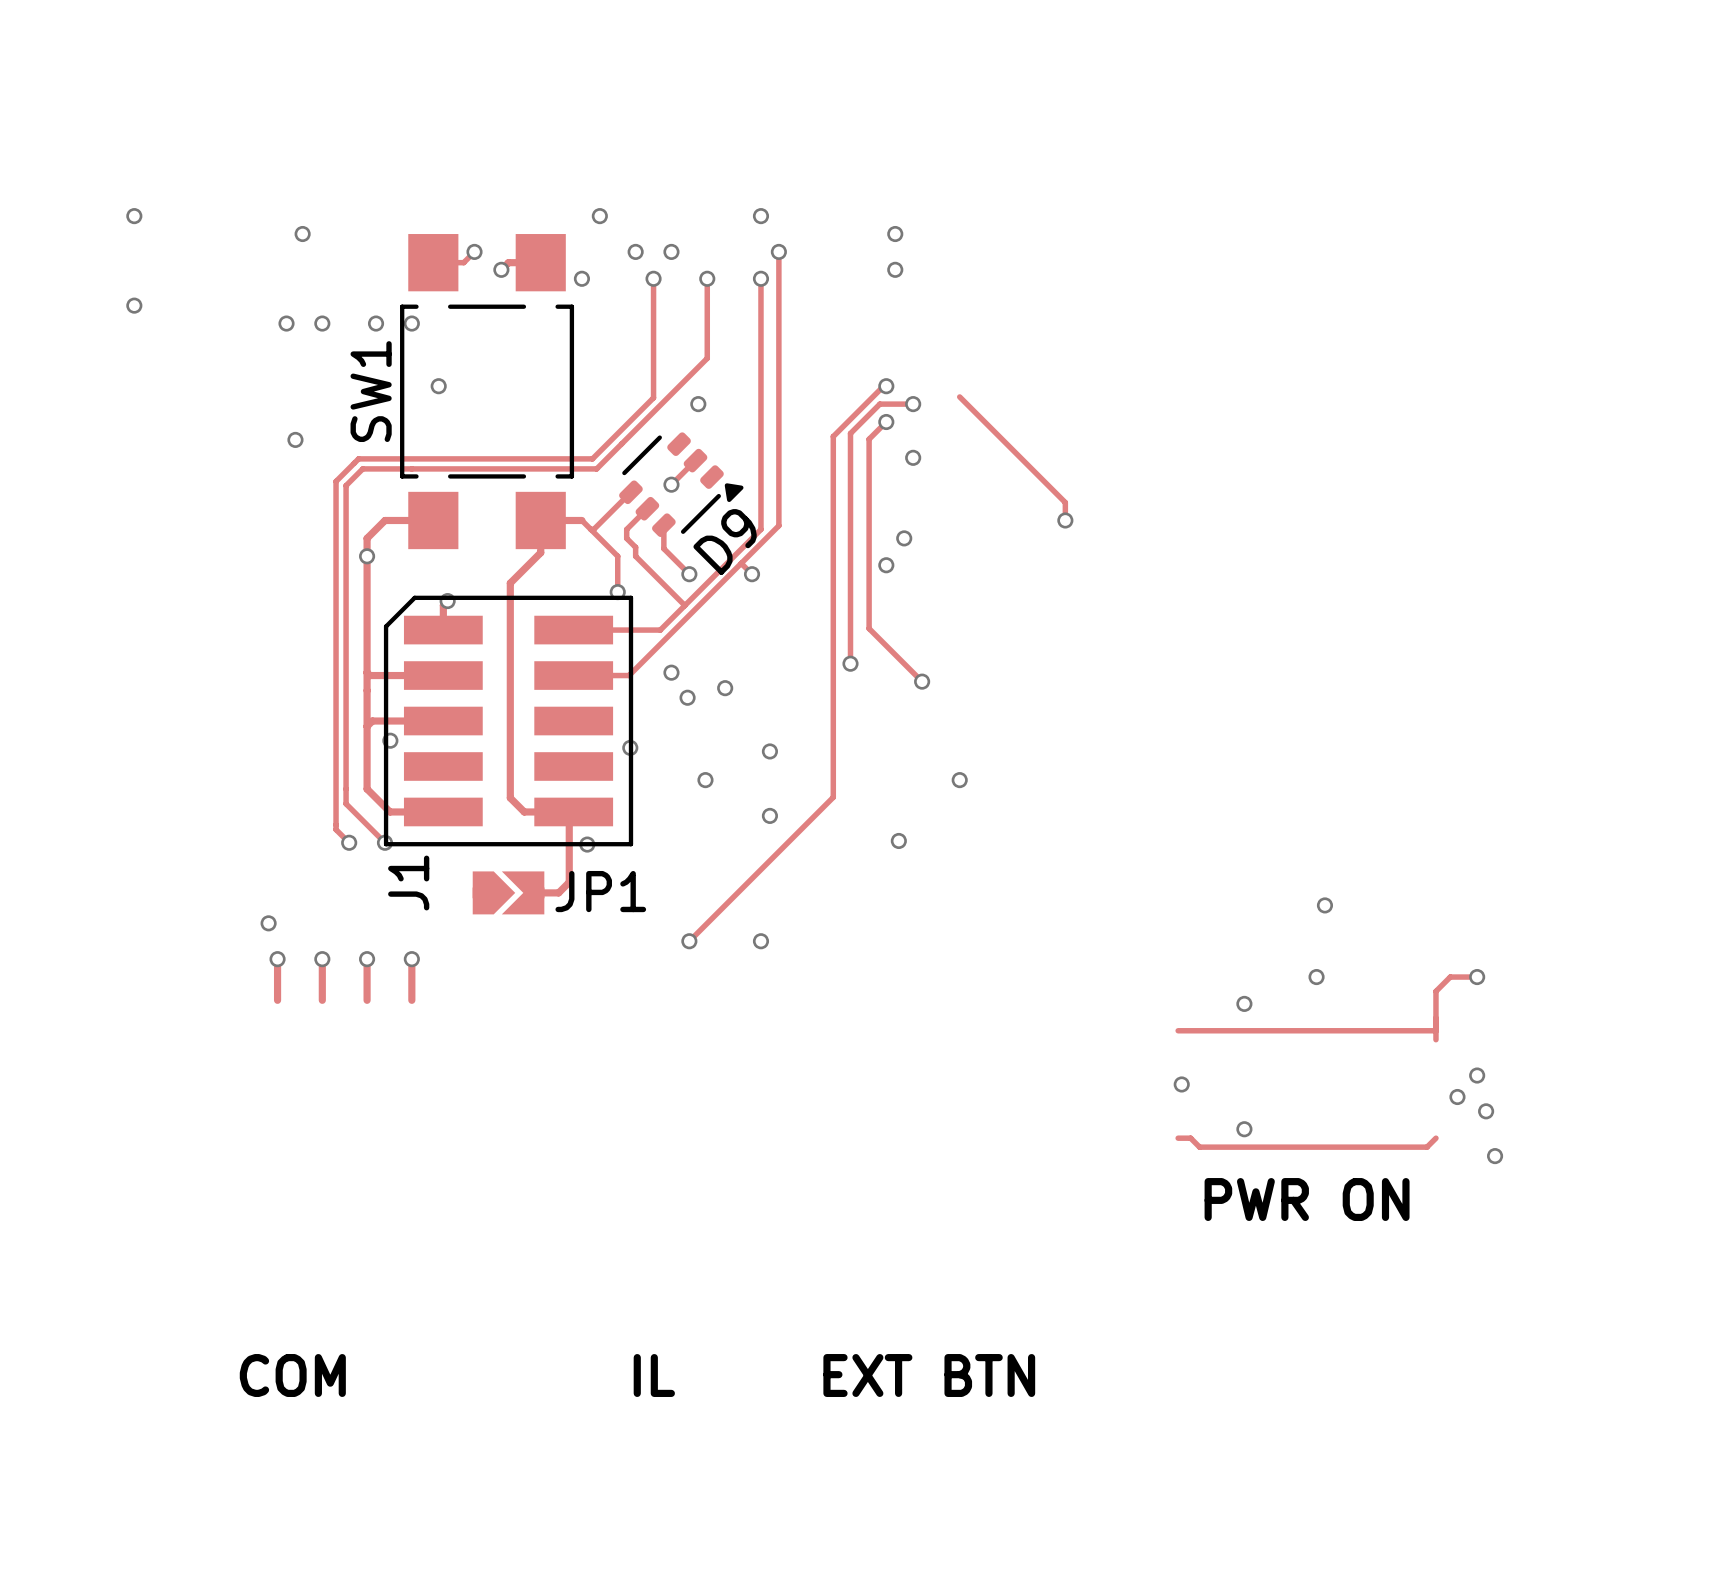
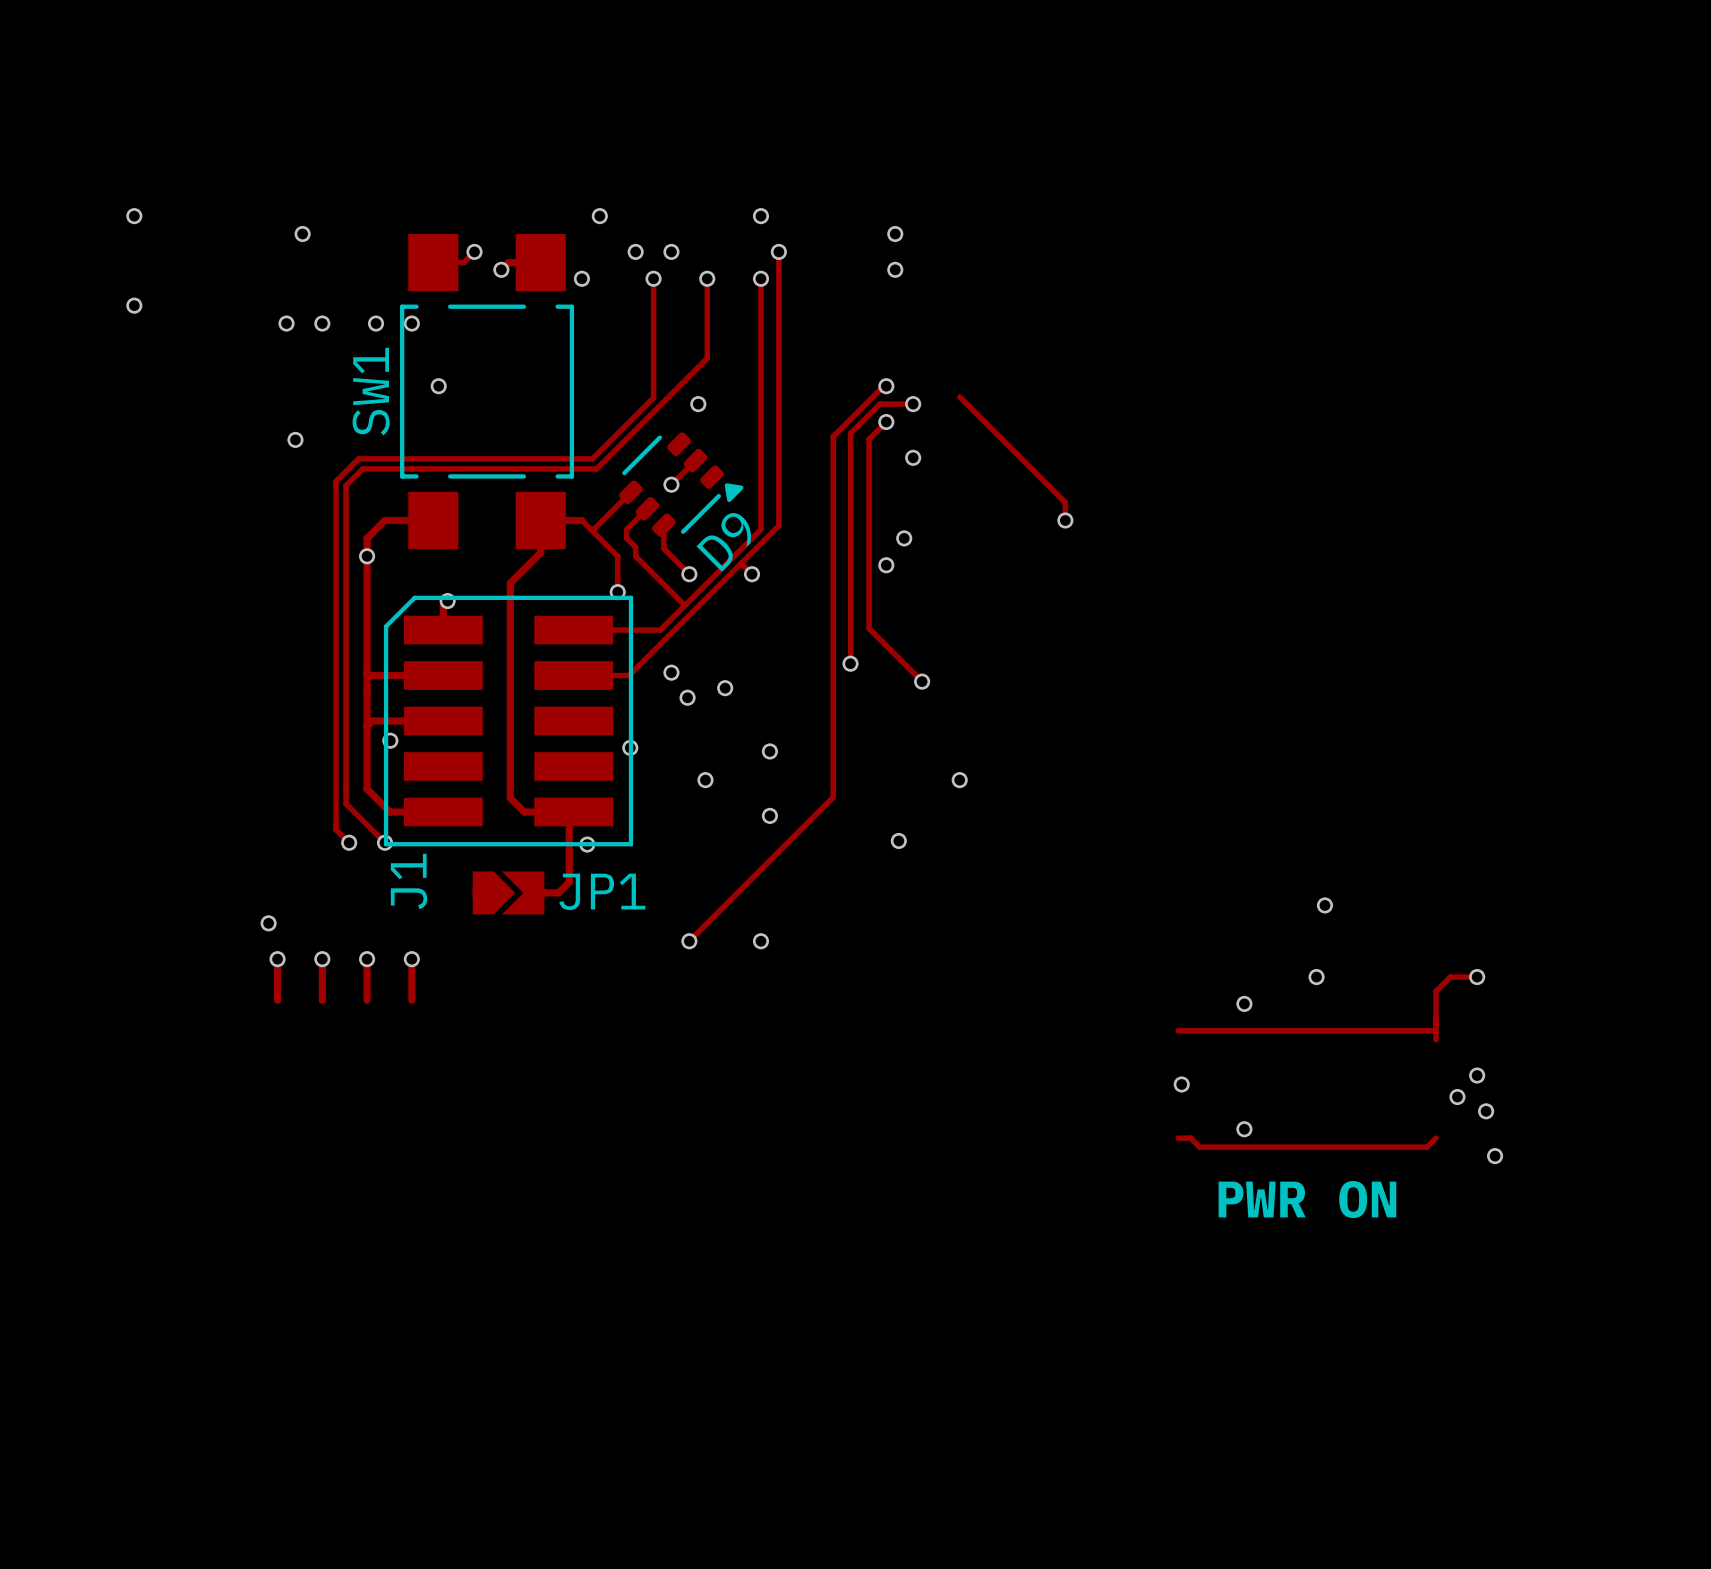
text: COM (292, 1375) -> none
text: IL (654, 1375) -> none
text: EXT BTN (929, 1375) -> none

